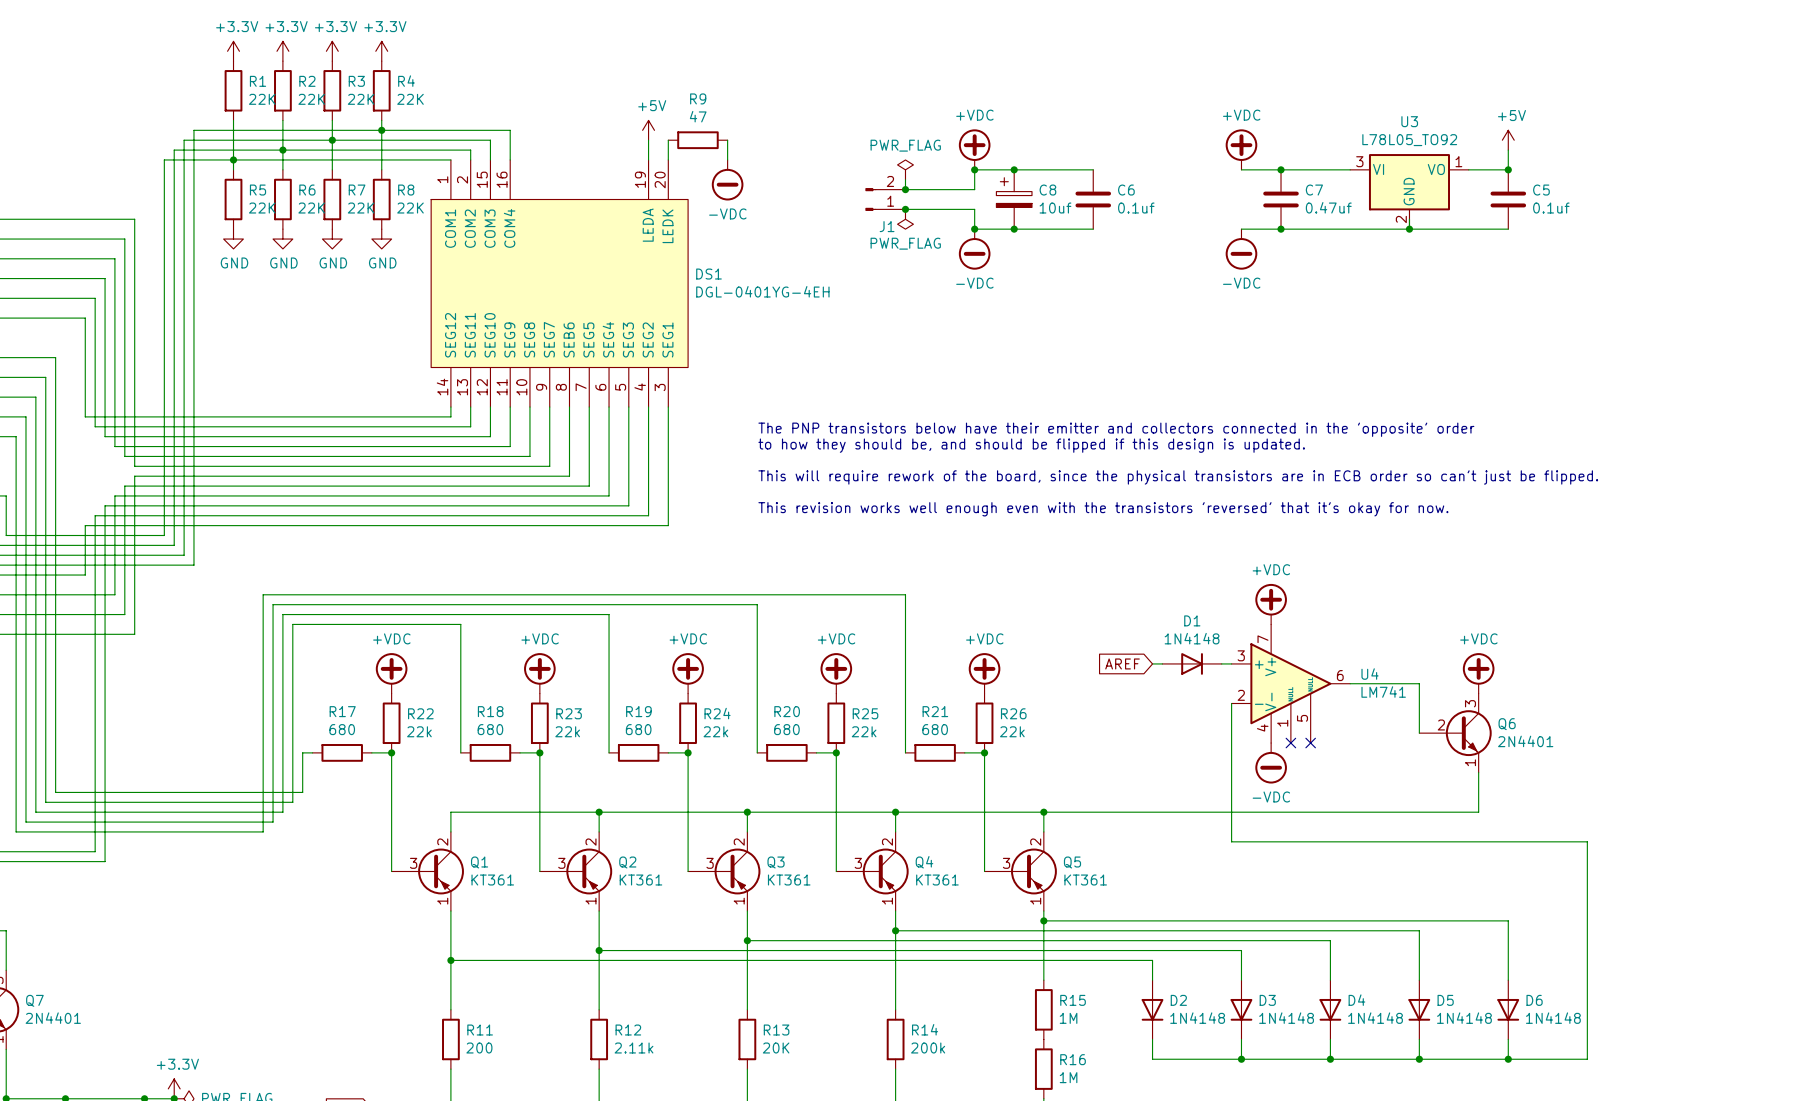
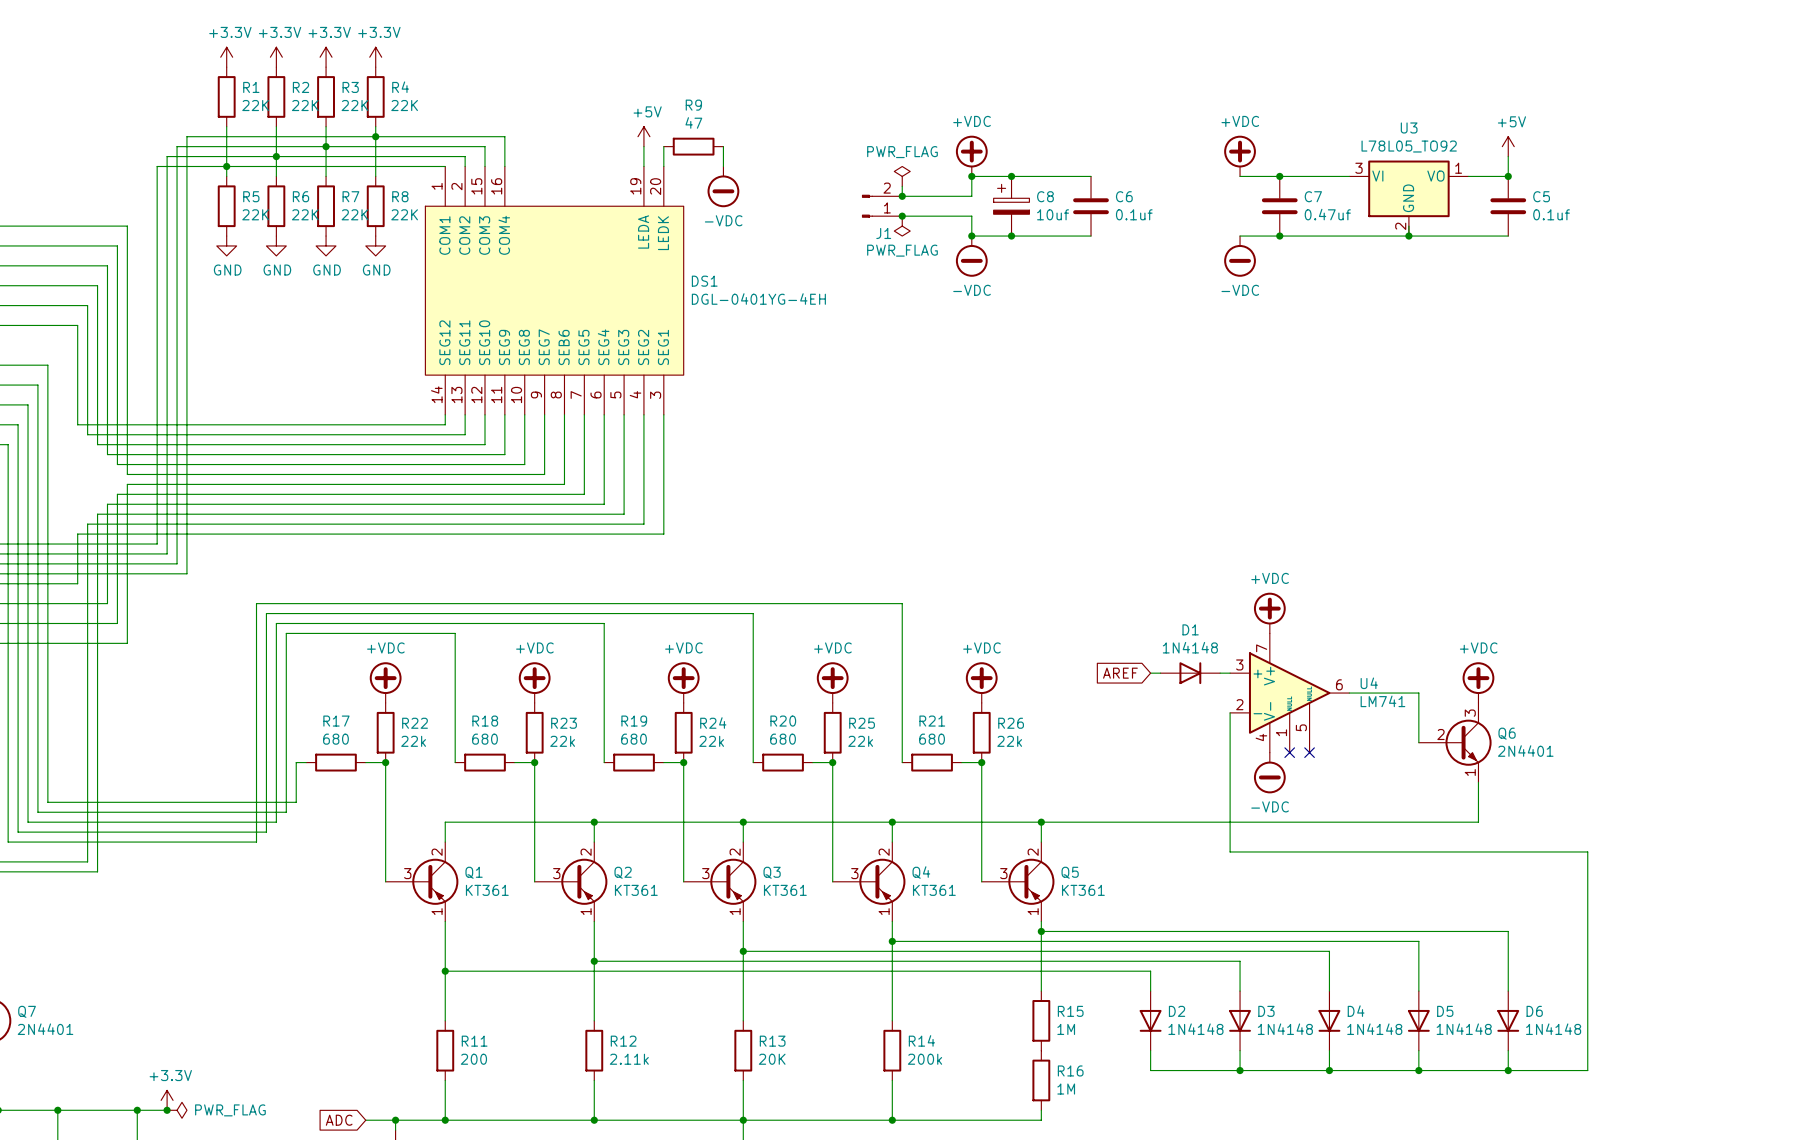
text: The PNP transistors below have their emitter and collectors connected in the 'opposite' order (1116, 429) -> none
text: to how they should be, and should be flipped if this design is updated. (1031, 445) -> none
text: This will require rework of the board, since the physical transistors are in ECB order so can't just be flipped. (1178, 477) -> none
text: This revision works well enough even with the transistors 'reversed' that it's okay for now. (1103, 509) -> none

